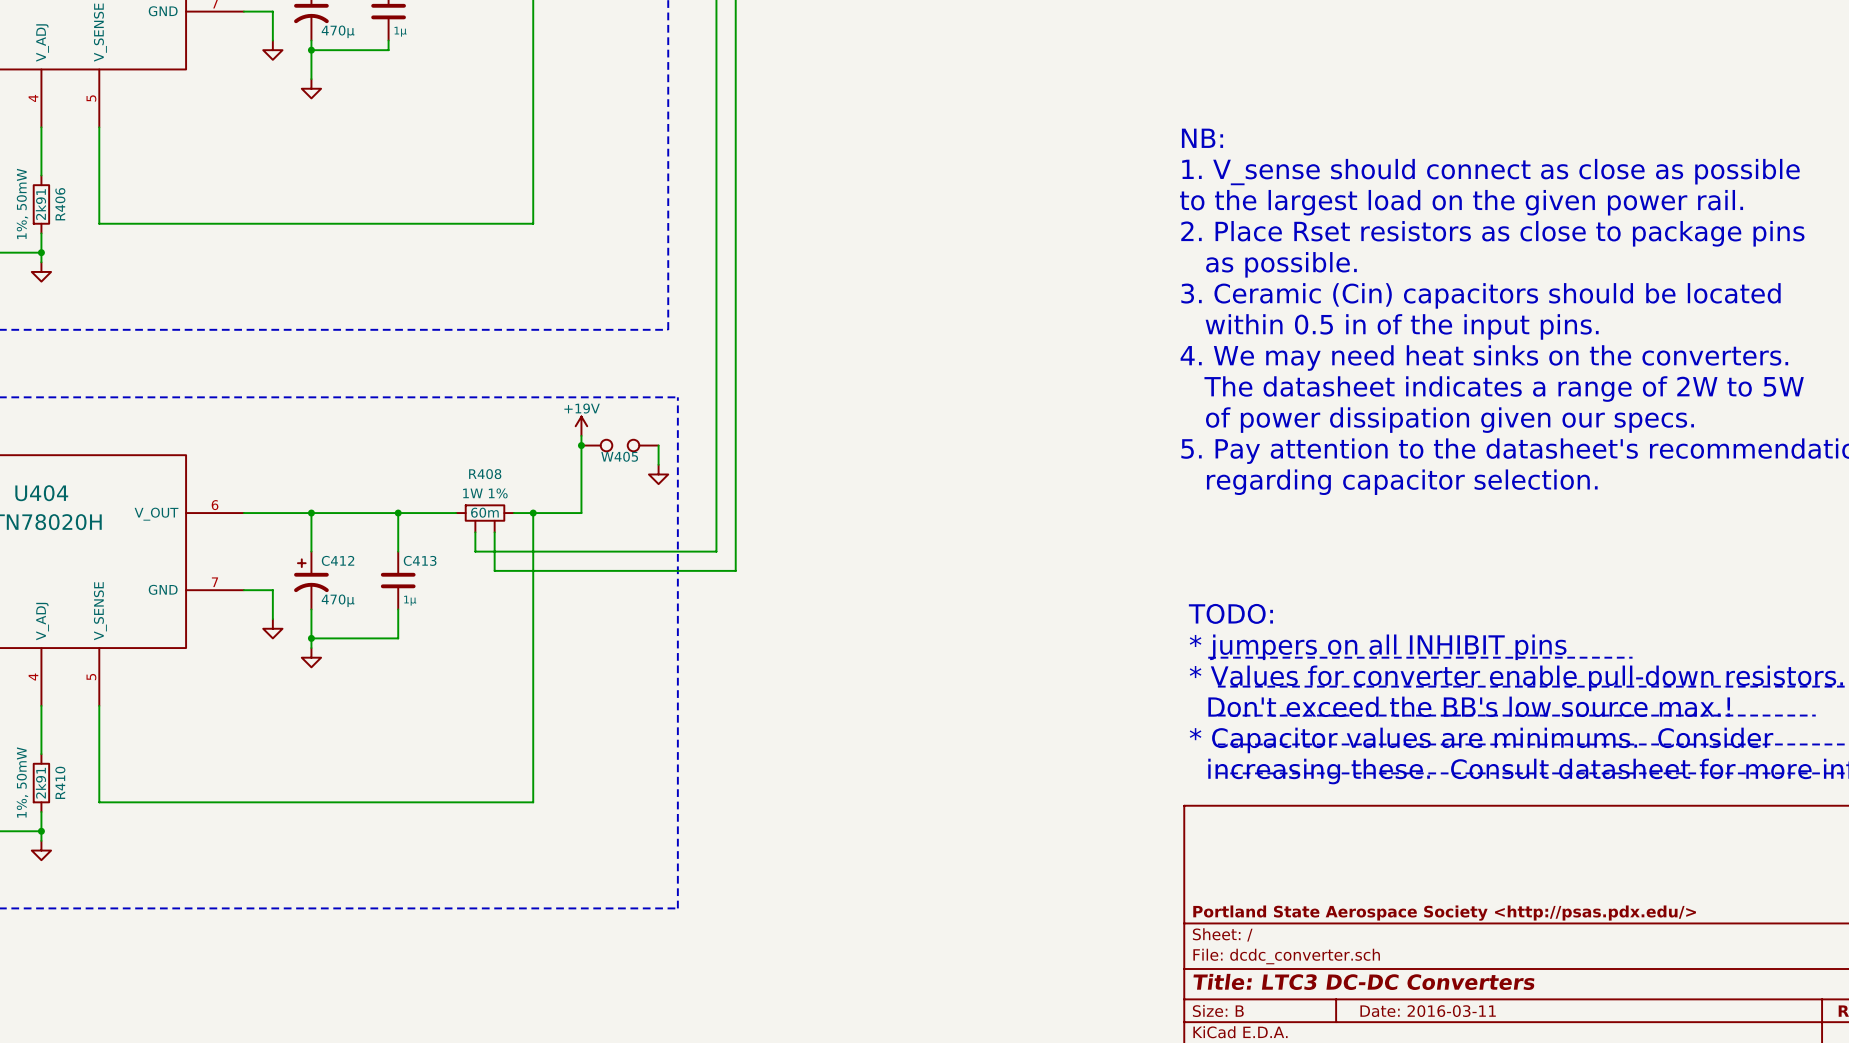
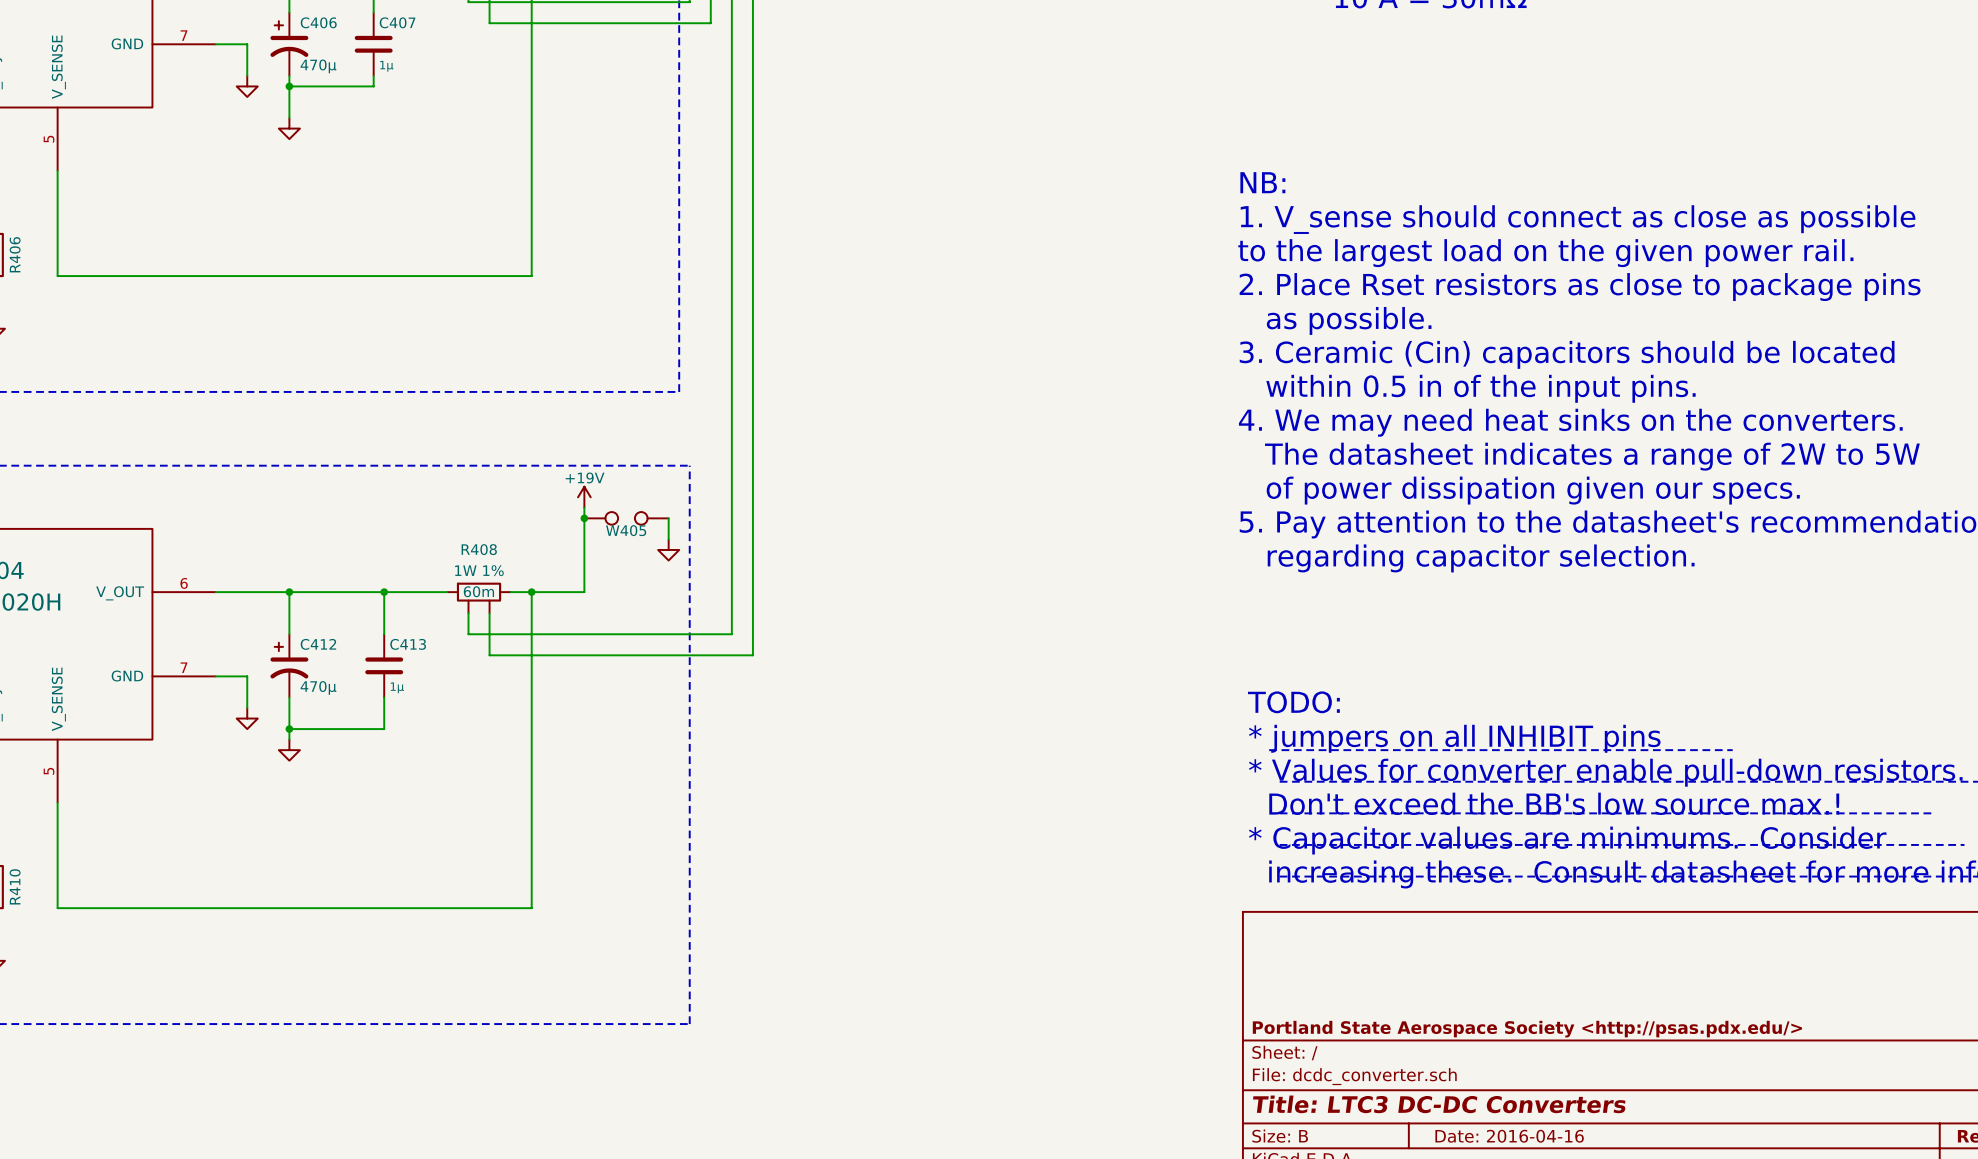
title block: Date: 2016-03-11 (1428, 1011) -> Date: 2016-04-16 (1509, 1136)

